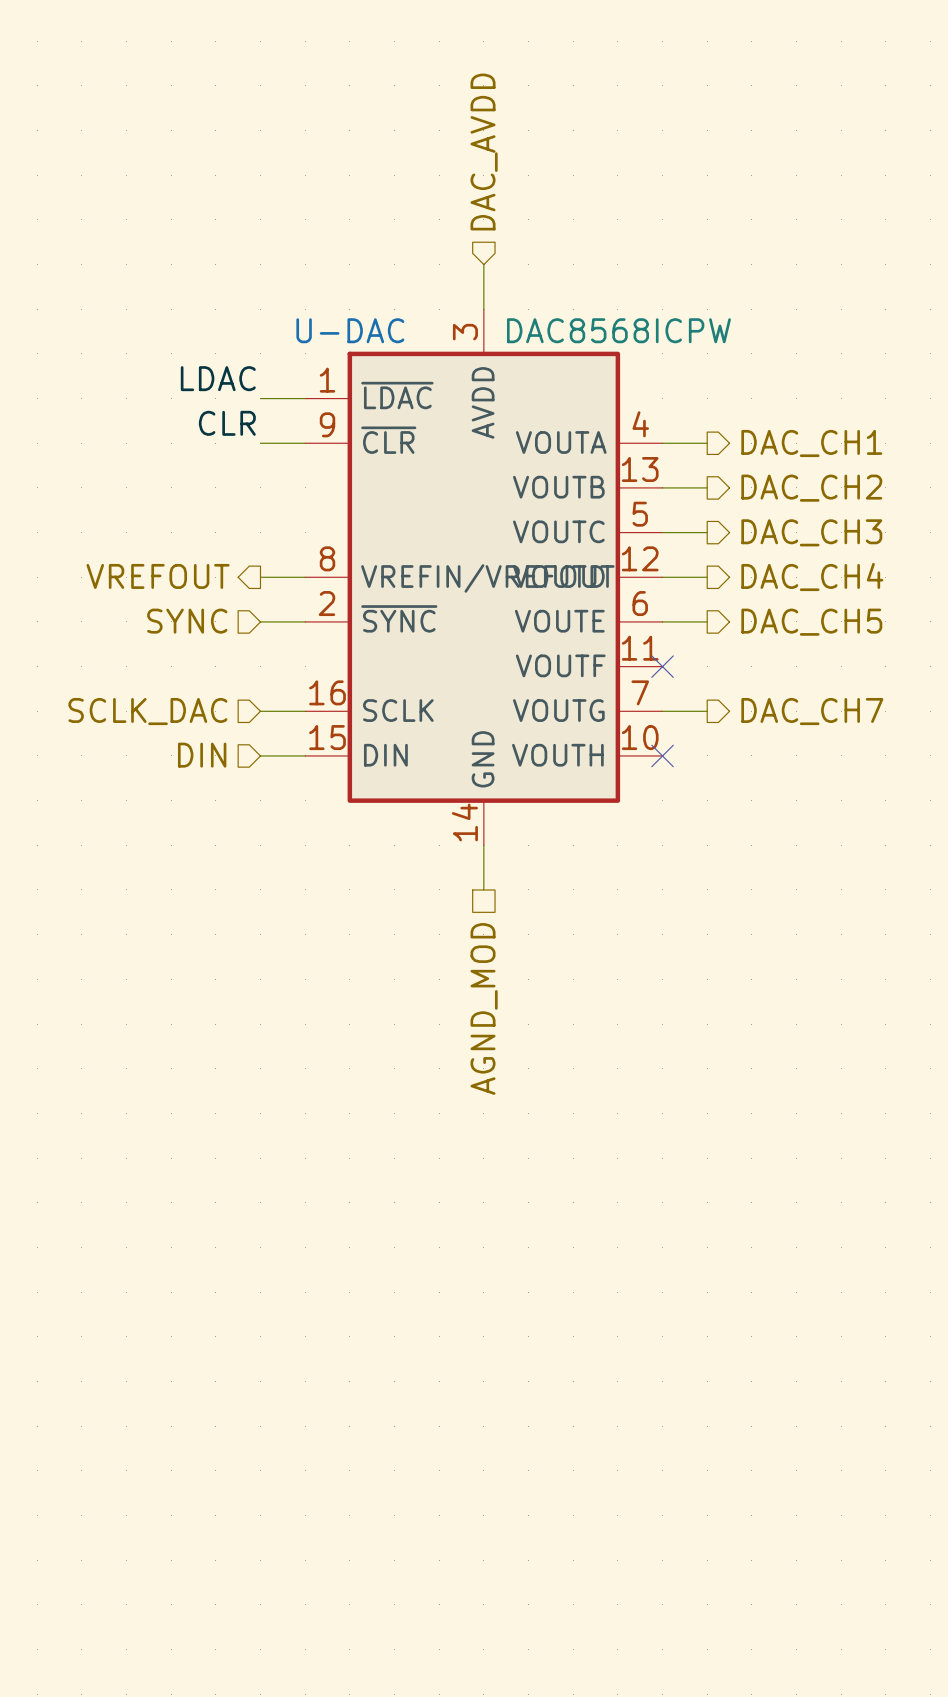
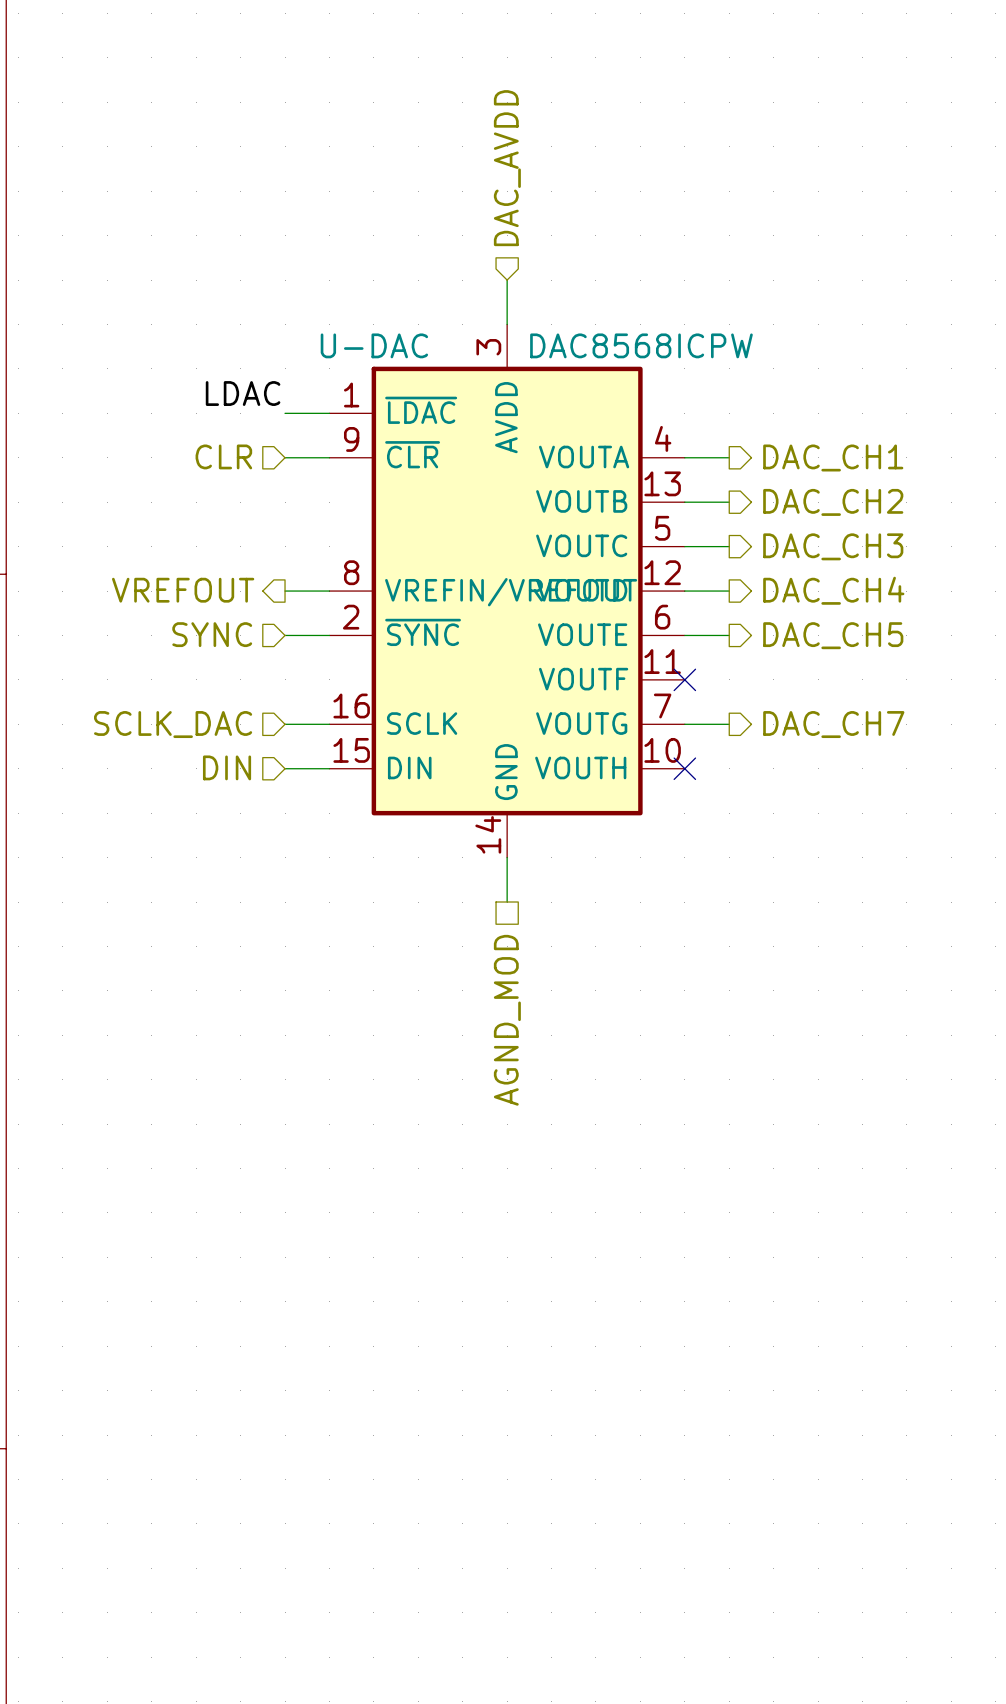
label: CLR (227, 423) -> none
hierarchical label: none -> CLR (223, 456)

